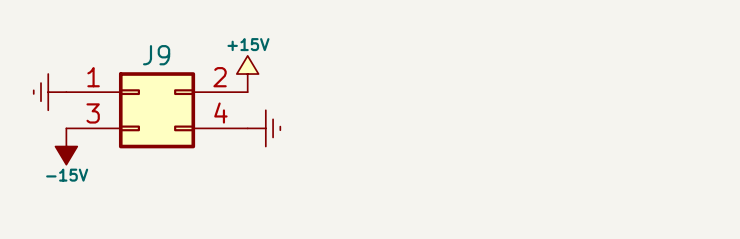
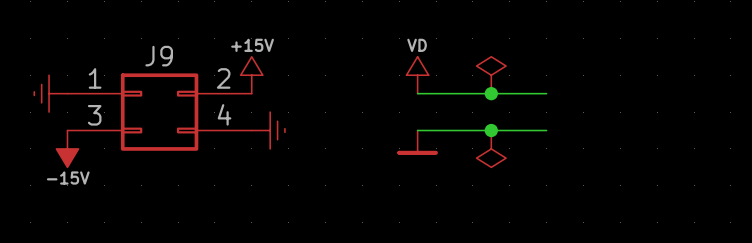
power symbol: none -> VD (417, 75)
power symbol: none -> (491, 75)
wire: none -> (417, 93) (546, 93)
junction: none -> (491, 93)
wire: none -> (417, 130) (546, 130)
junction: none -> (491, 130)
power symbol: none -> (417, 142)
power symbol: none -> (491, 148)

